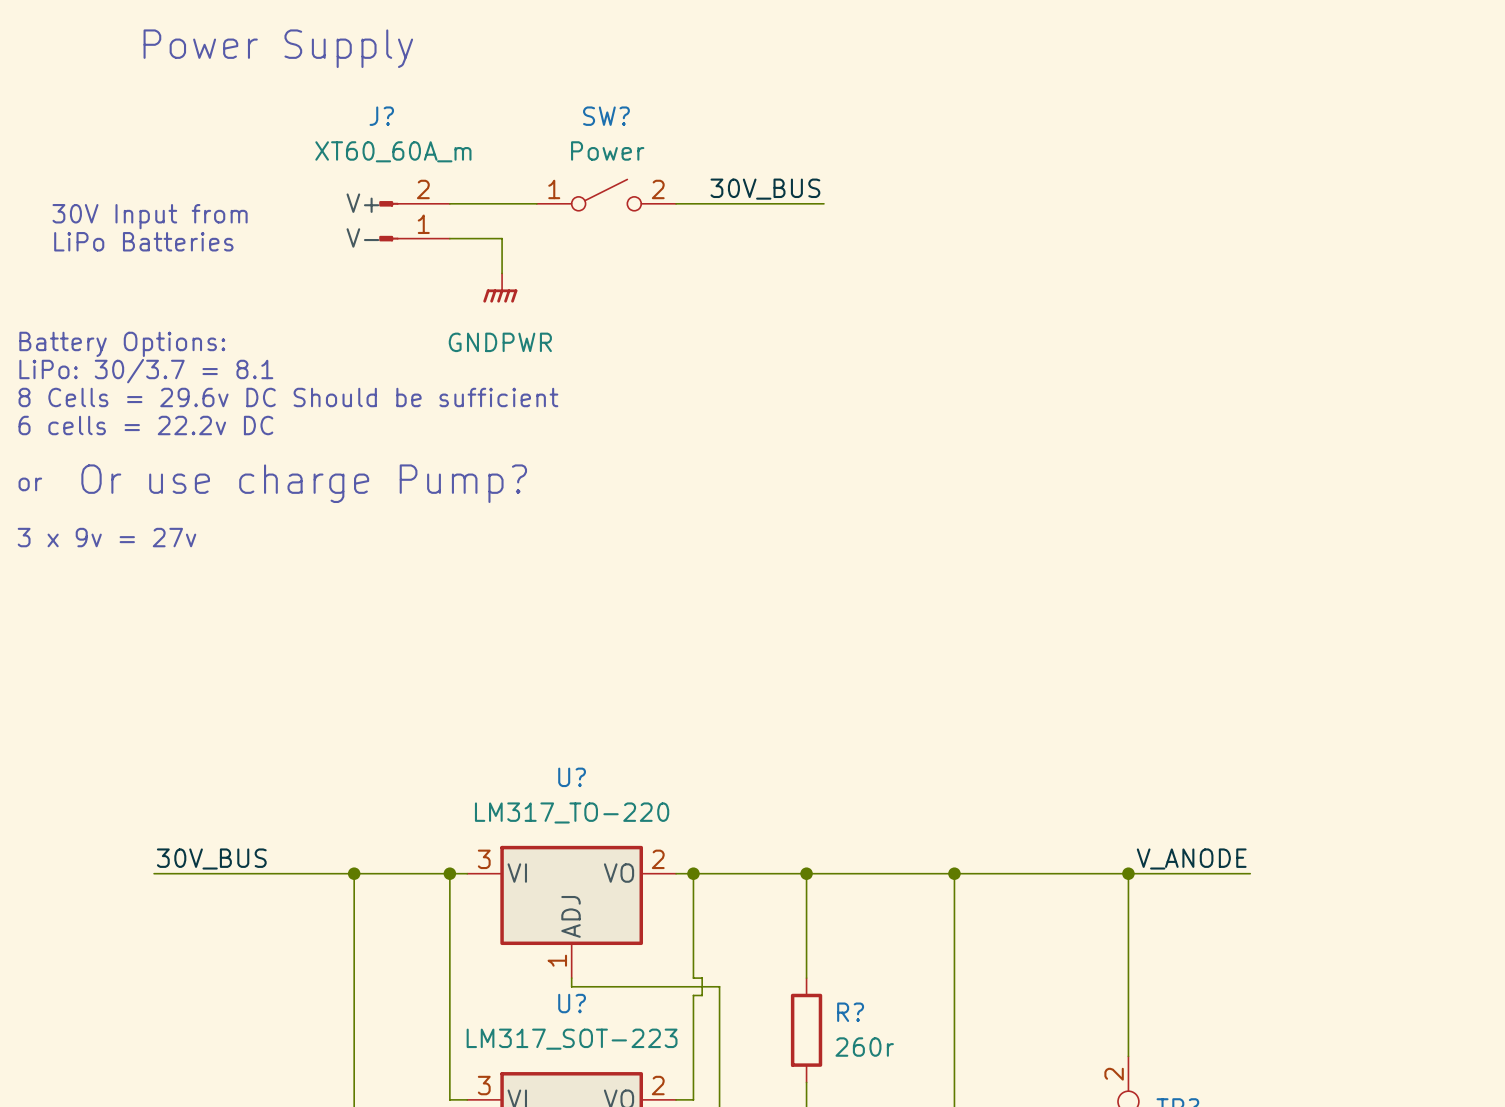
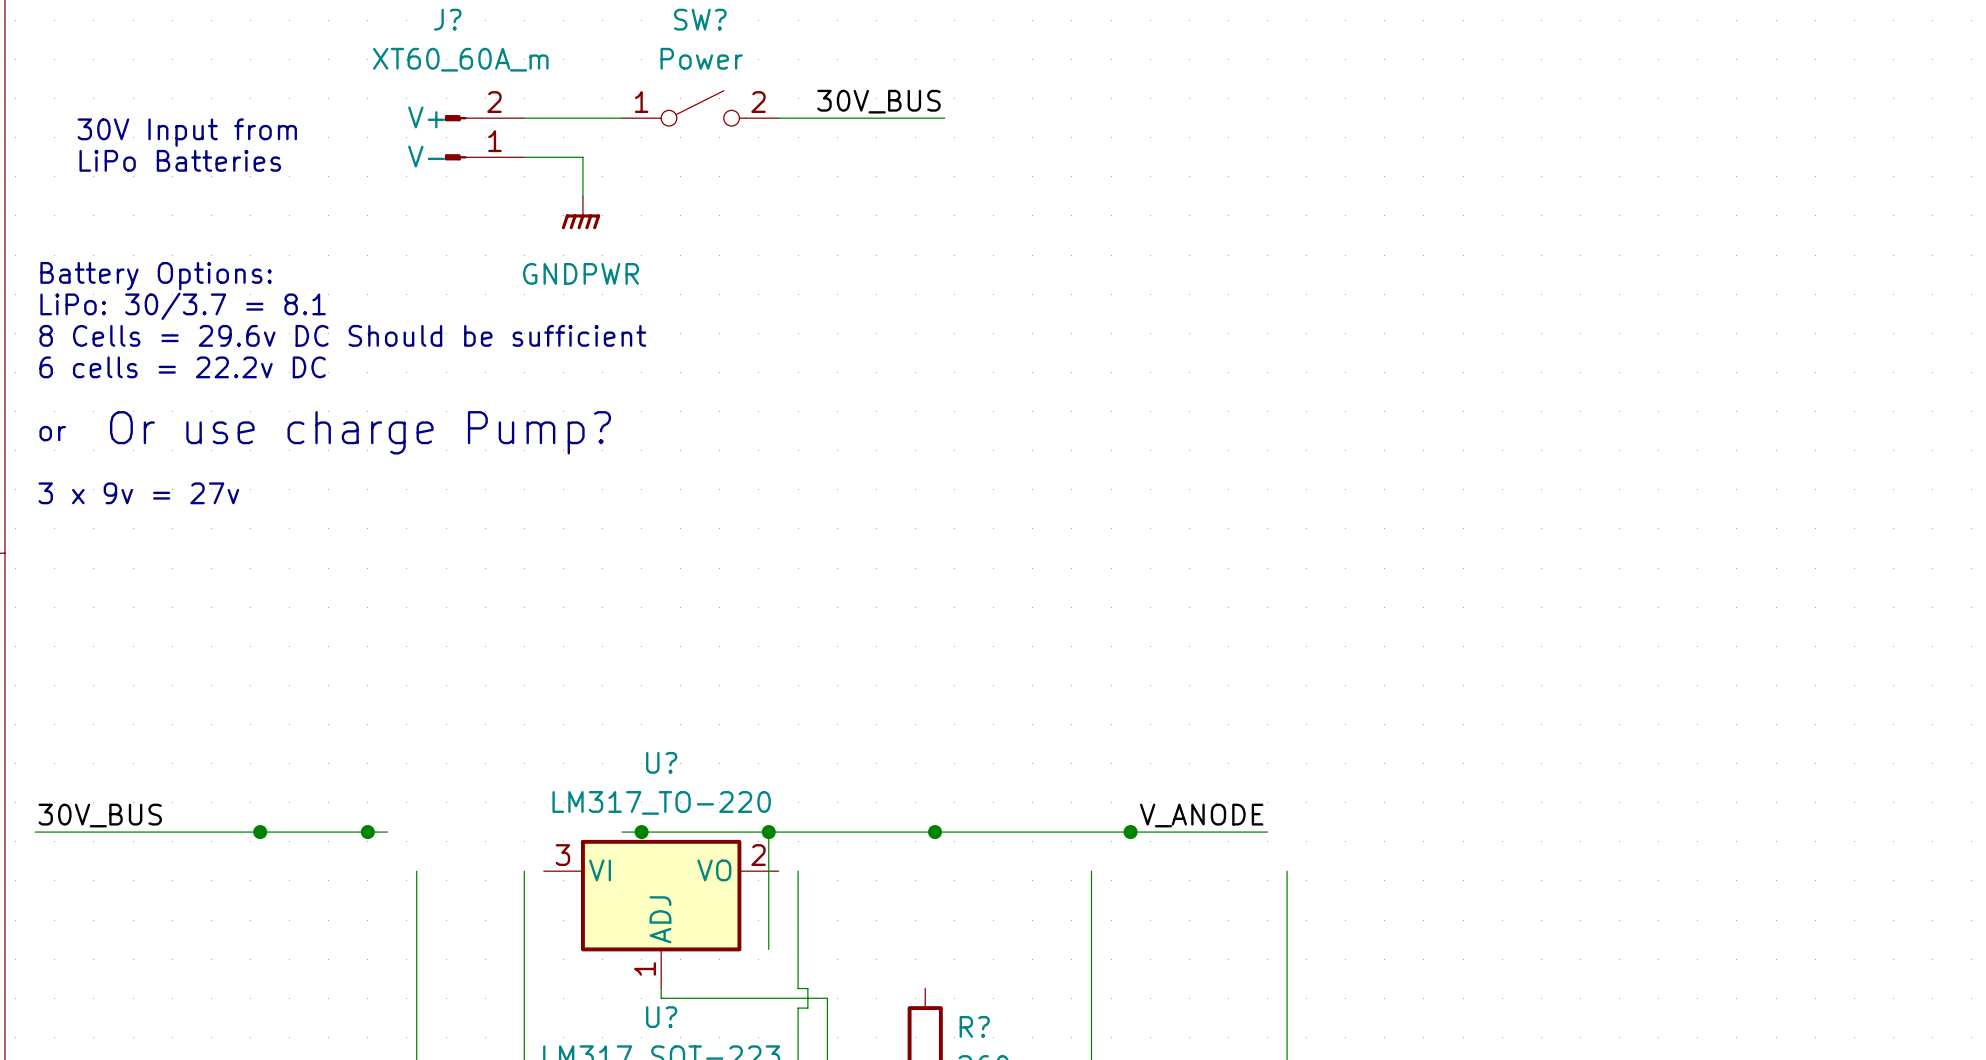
junction: none -> (260, 832)
junction: none -> (641, 832)
label position: 30V_BUS (211, 858) -> 30V_BUS (100, 815)
label position: V_ANODE (1191, 858) -> V_ANODE (1201, 815)
wire: (154, 873) (467, 873) -> (35, 832) (387, 832)
junction position: (354, 873) -> (367, 832)
junction: (449, 873) -> none
wire: (676, 873) (1250, 873) -> (622, 832) (1267, 832)
junction position: (693, 873) -> (768, 832)
wire: (806, 873) (806, 978) -> (768, 832) (768, 949)
junction position: (806, 873) -> (935, 832)
junction position: (954, 873) -> (1130, 832)
junction: (1128, 873) -> none

